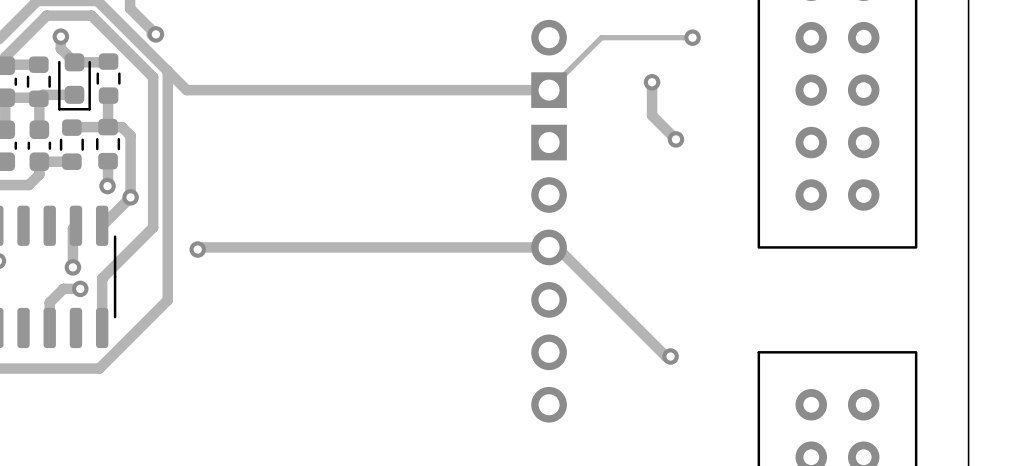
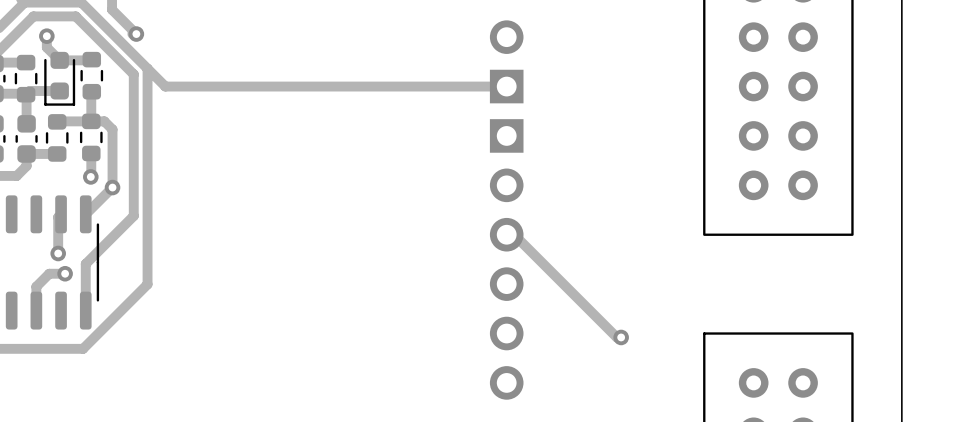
track: (692, 37) (601, 37) (549, 90) -> none
via: (692, 37) -> none
track: (652, 82) (652, 115) (675, 139) -> none
via: (652, 82) -> none
via: (675, 139) -> none
track: (549, 247) (199, 247) (197, 249) -> none
via: (197, 249) -> none

